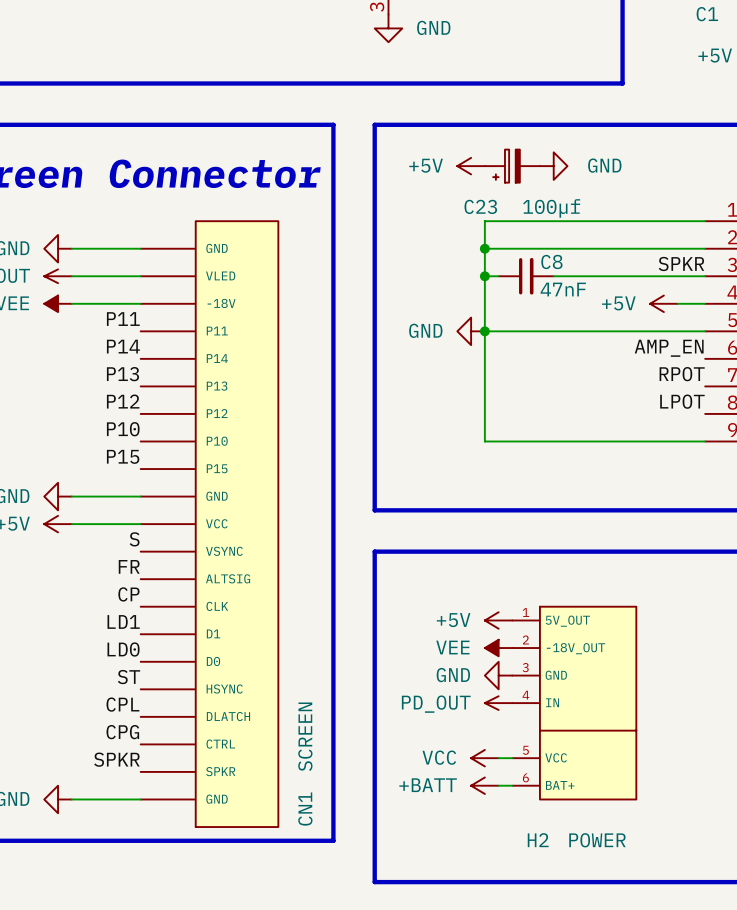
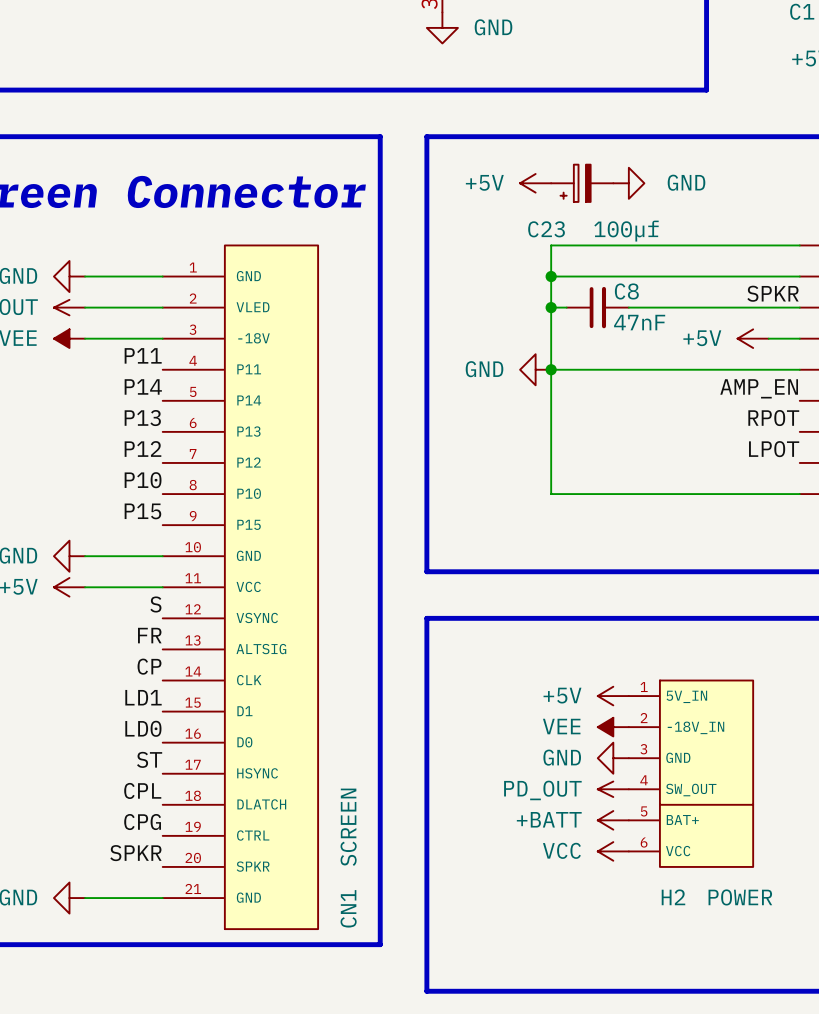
CN1 symbol: [140, 221, 279, 828] -> [162, 245, 319, 930]
H2 symbol: [512, 606, 637, 800] -> [628, 680, 754, 867]
power symbol position: +5V (498, 620) -> +5V (613, 696)
power symbol position: VEE (498, 648) -> VEE (613, 727)
power symbol position: GND (498, 675) -> GND (613, 758)
power symbol position: PD_OUT (498, 703) -> PD_OUT (613, 789)
power symbol position: VCC (484, 758) -> VCC (613, 851)
wire: (498, 758) (512, 758) -> none
power symbol position: +BATT (484, 785) -> +BATT (613, 820)
wire: (498, 785) (512, 785) -> none
H2 name position: H2 (538, 840) -> H2 (673, 897)
H2 value position: POWER (597, 840) -> POWER (740, 897)

